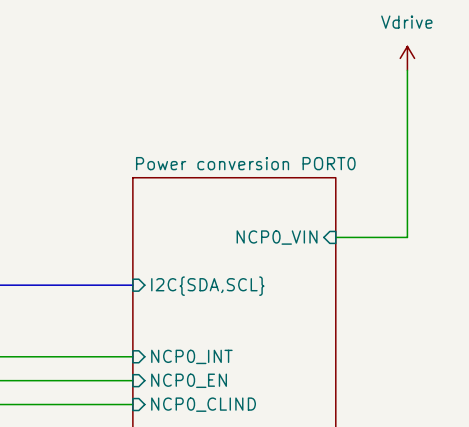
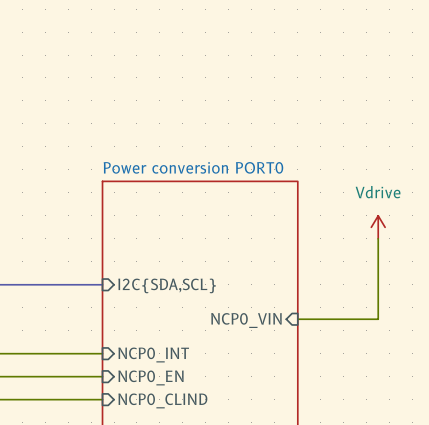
power symbol position: Vdrive (407, 58) -> Vdrive (378, 227)
wire: (407, 70) (407, 237) (335, 237) -> none
sheet pin position: NCP0_VIN (277, 237) -> NCP0_VIN (246, 320)
wire: none -> (378, 238) (378, 319) (297, 319)

